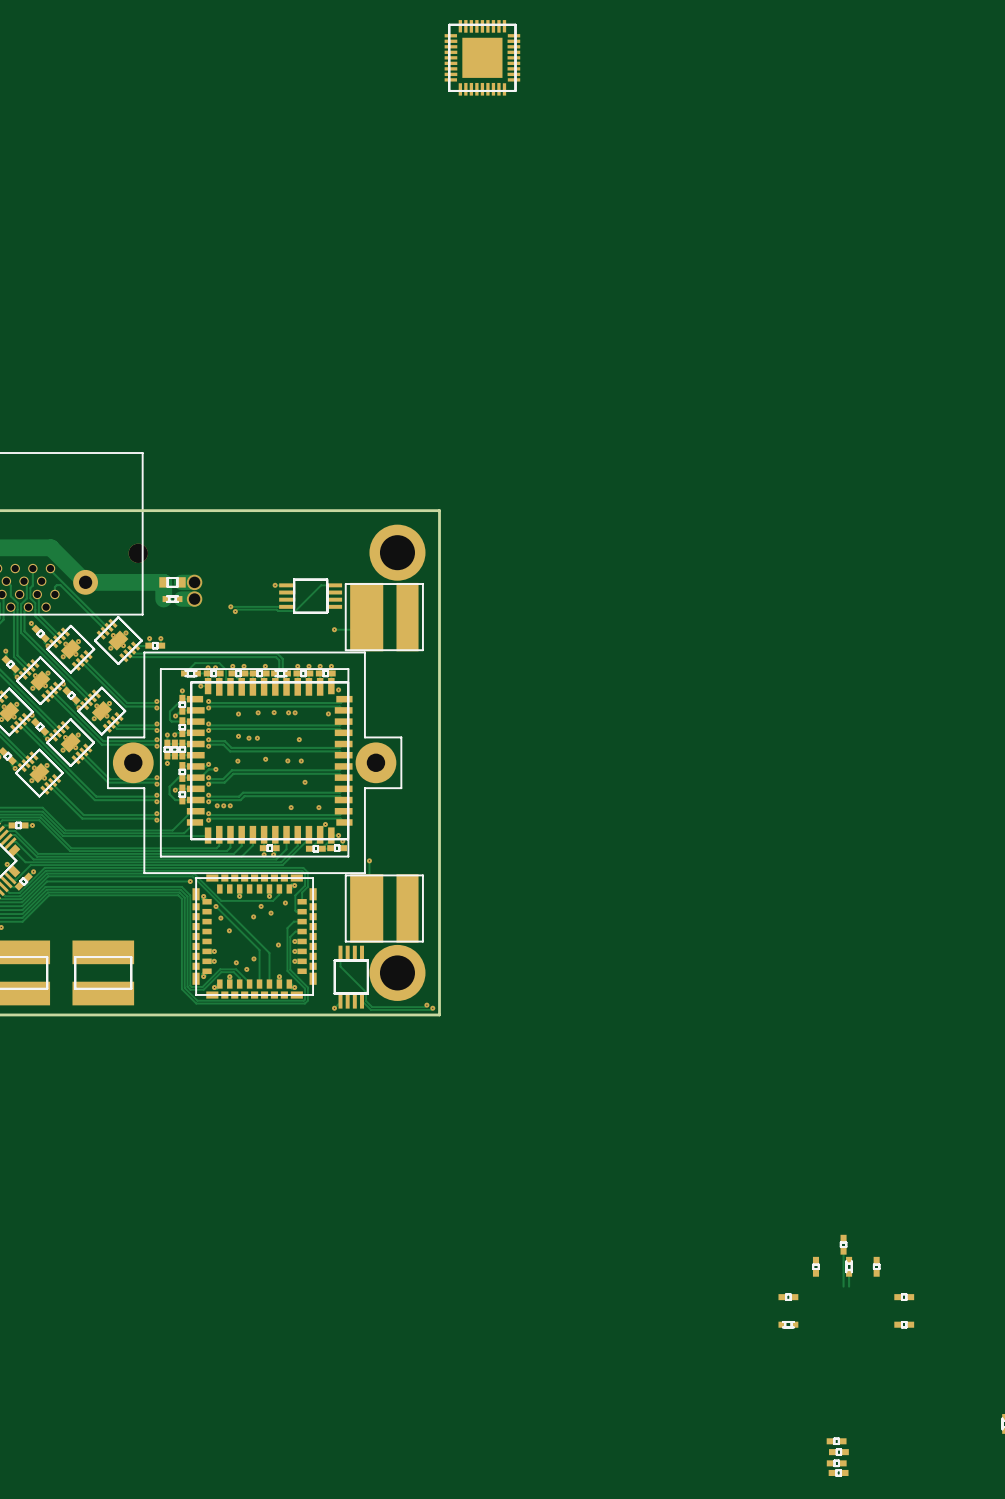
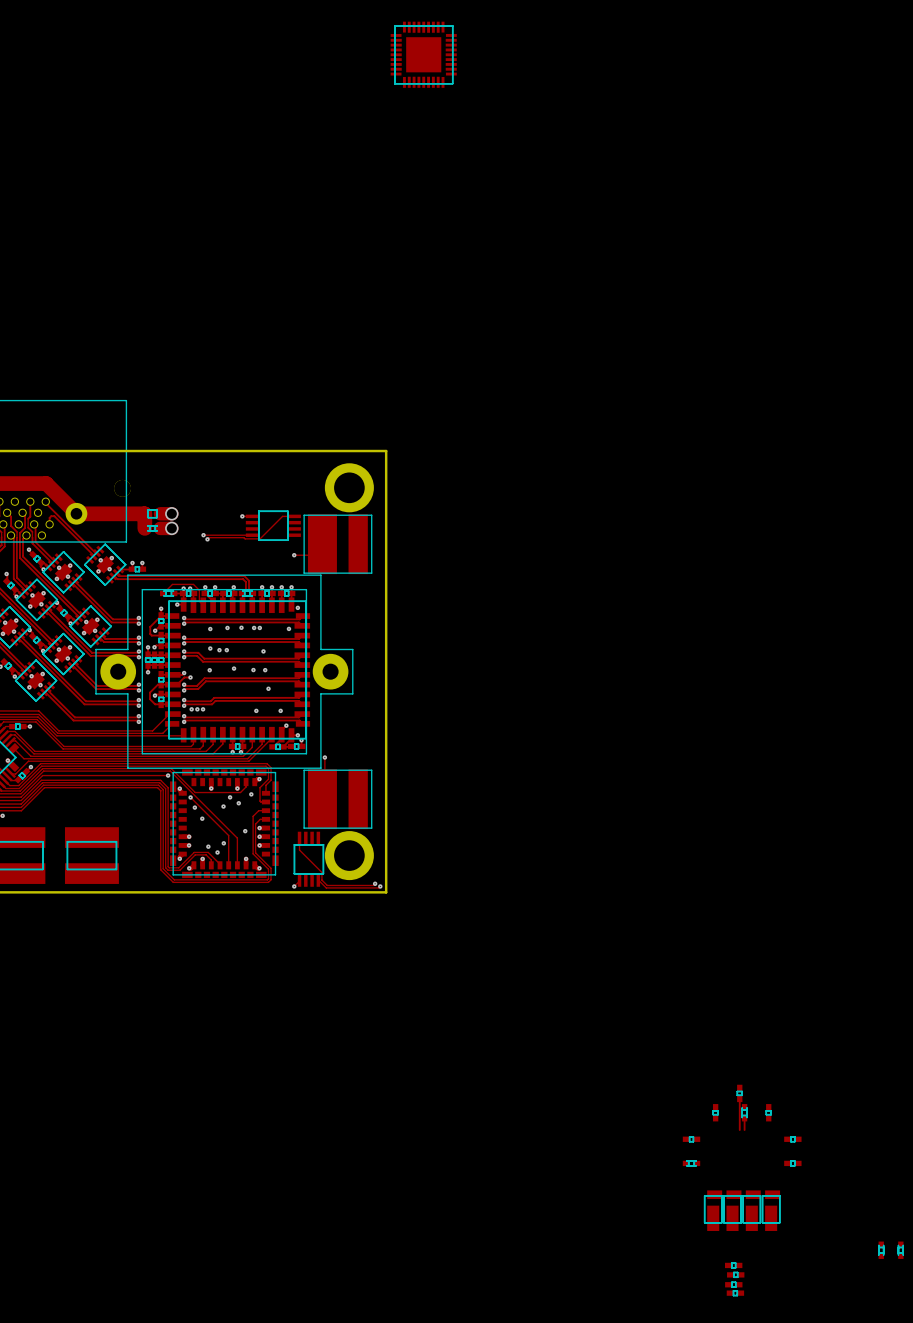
part: none -> (713, 1210)
part: none -> (732, 1210)
part: none -> (751, 1210)
part: none -> (771, 1210)

